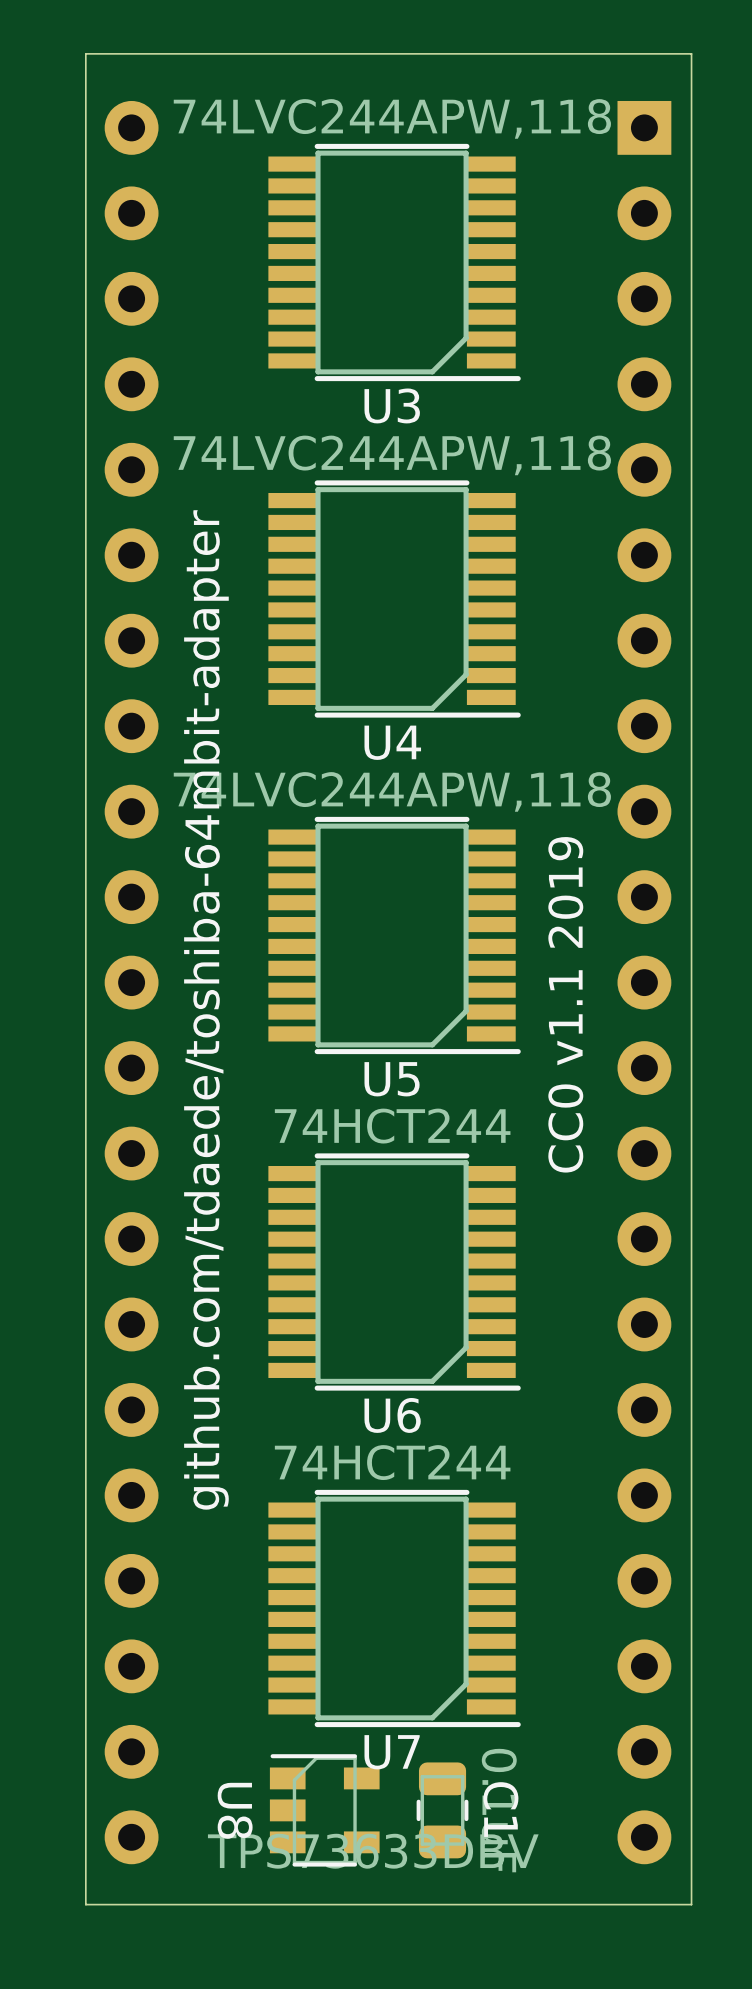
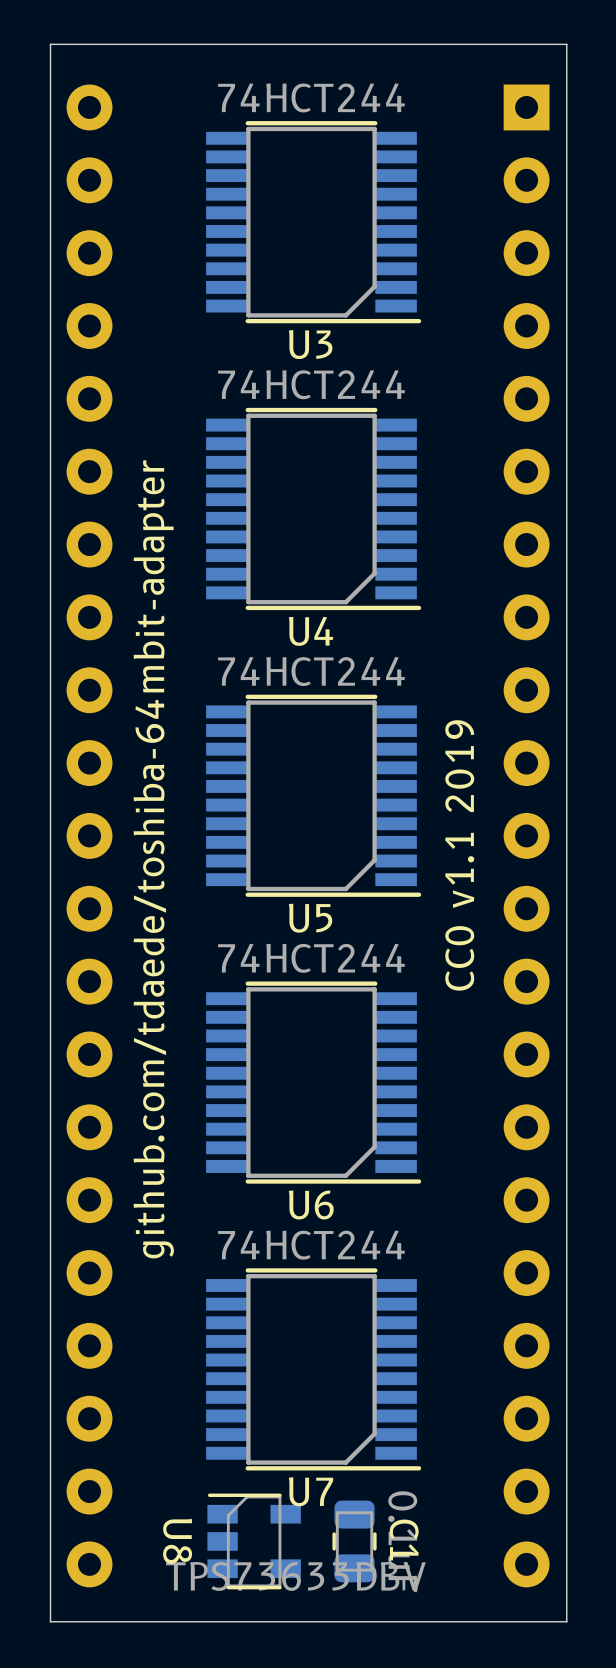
U3 value: 74LVC244APW,118 (392, 118) -> 74HCT244 (311, 97)
U4 value: 74LVC244APW,118 (392, 455) -> 74HCT244 (311, 384)
U5 value: 74LVC244APW,118 (392, 791) -> 74HCT244 (311, 671)

